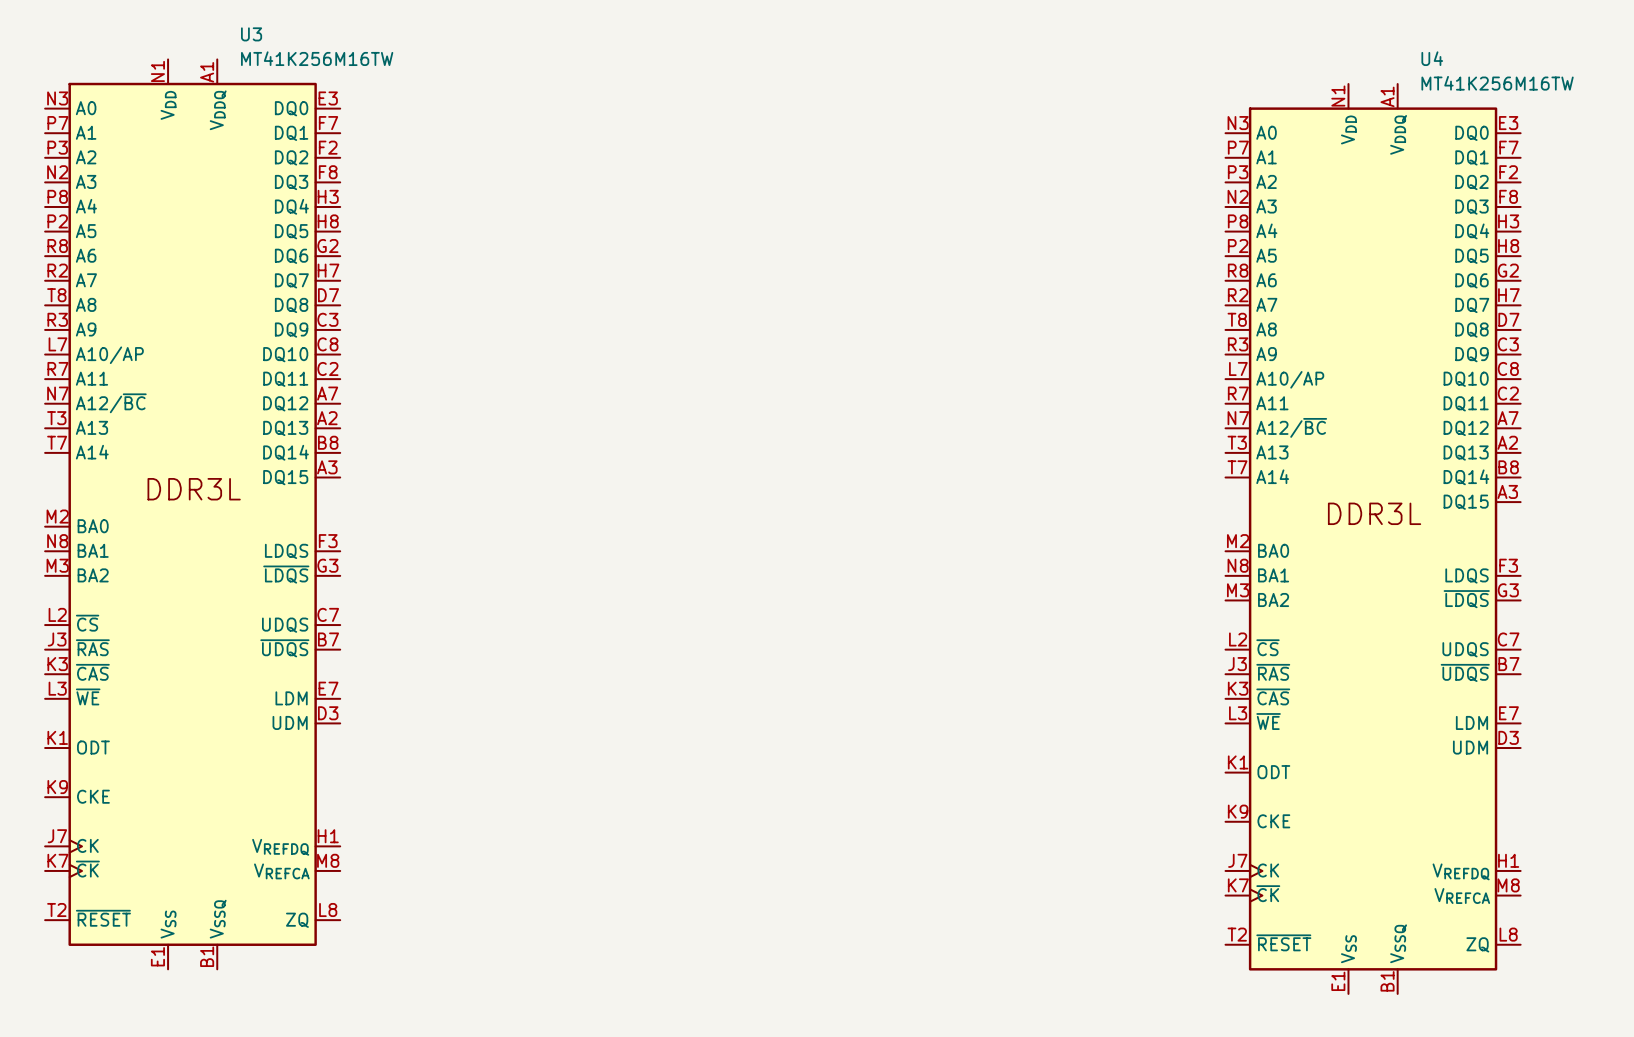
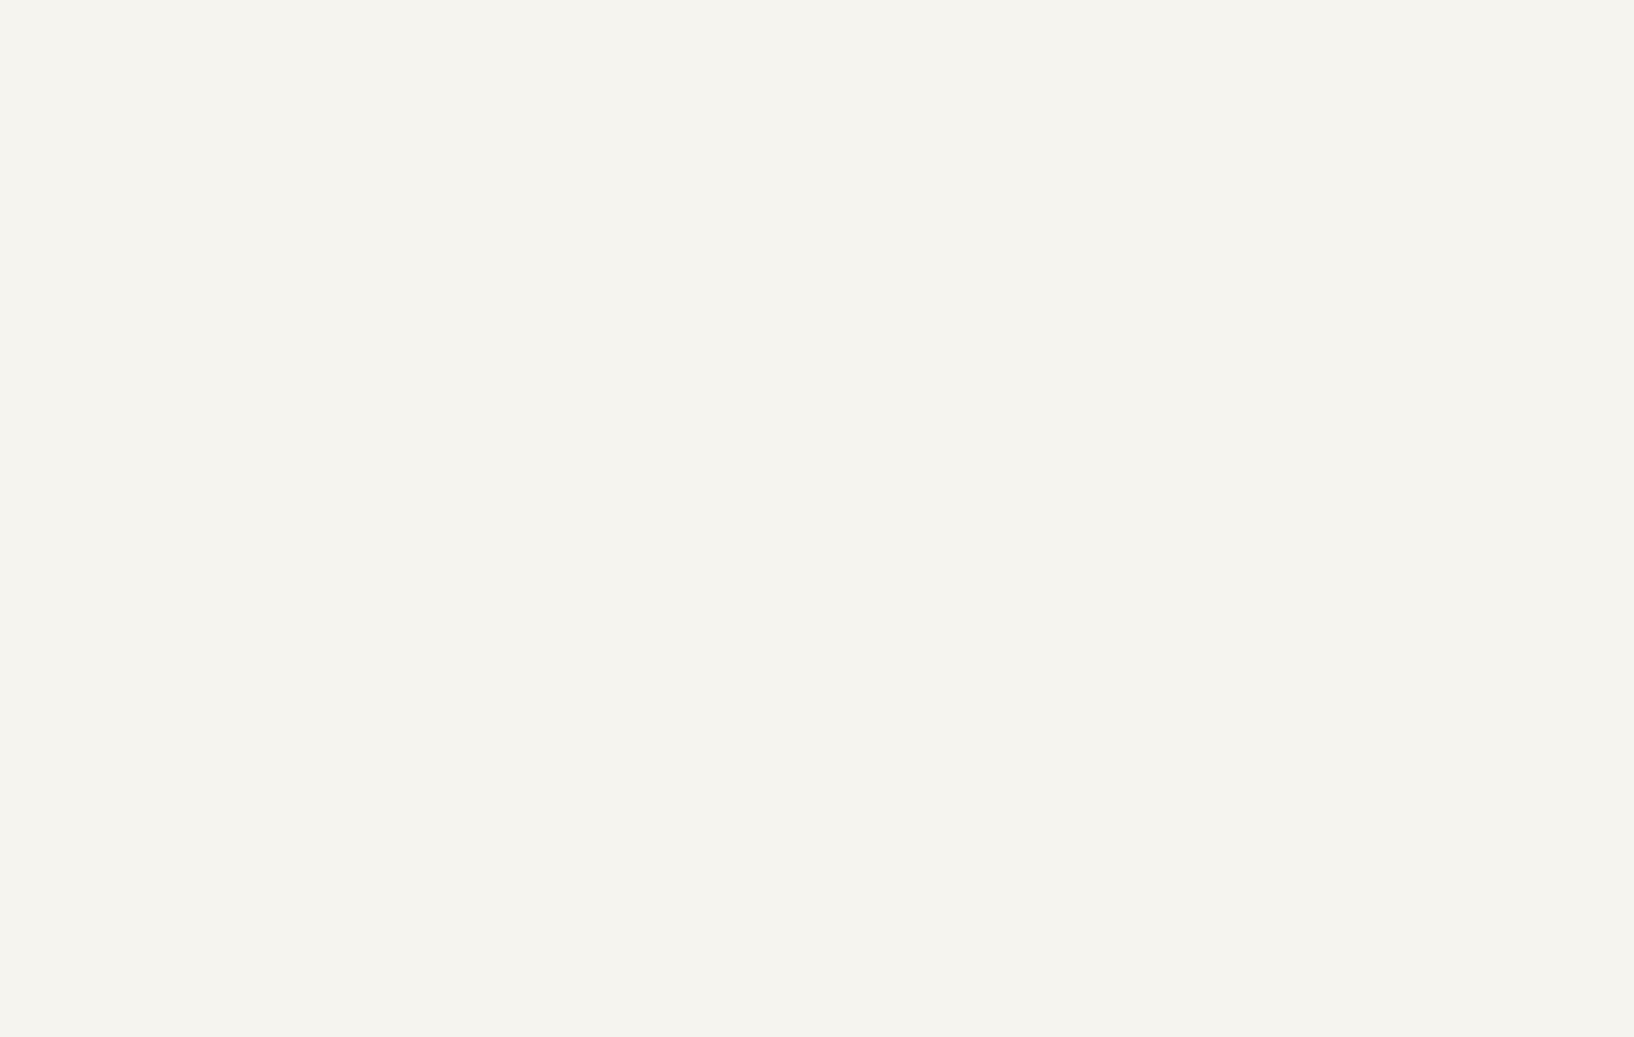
U3: MT41K256M16TW (192, 514) -> none
U4: MT41K256M16TW (1373, 538) -> none

